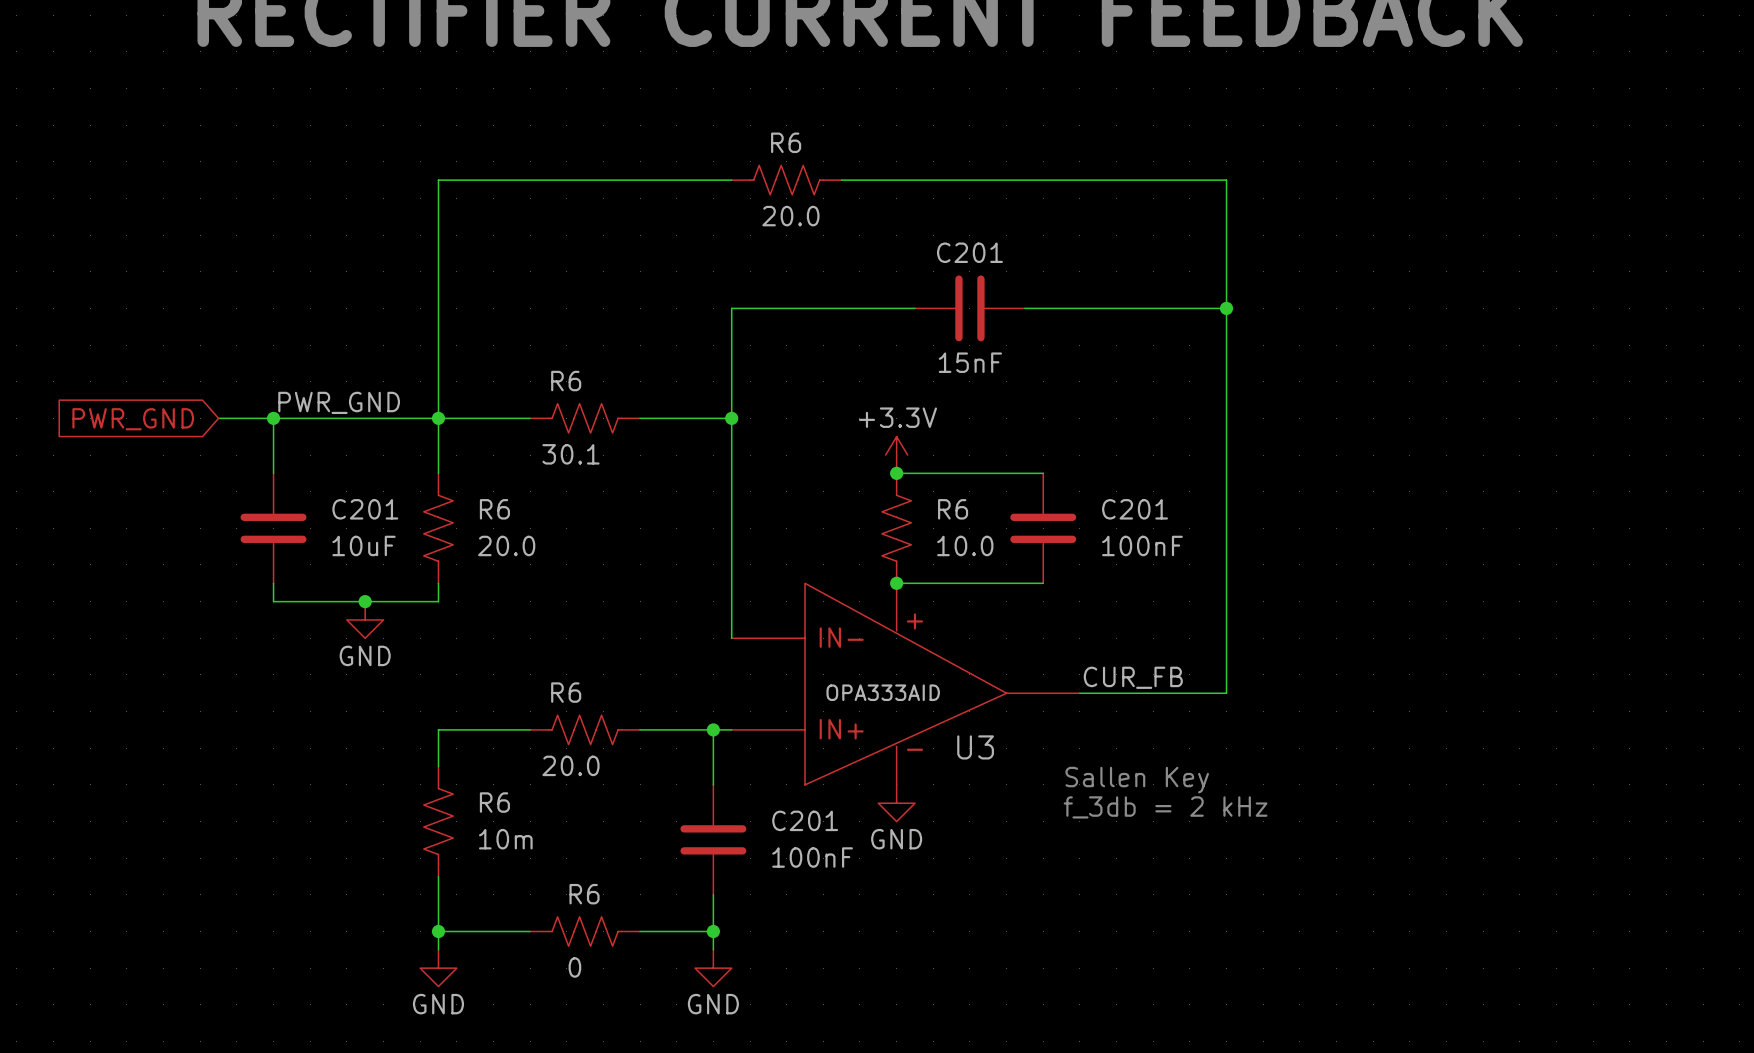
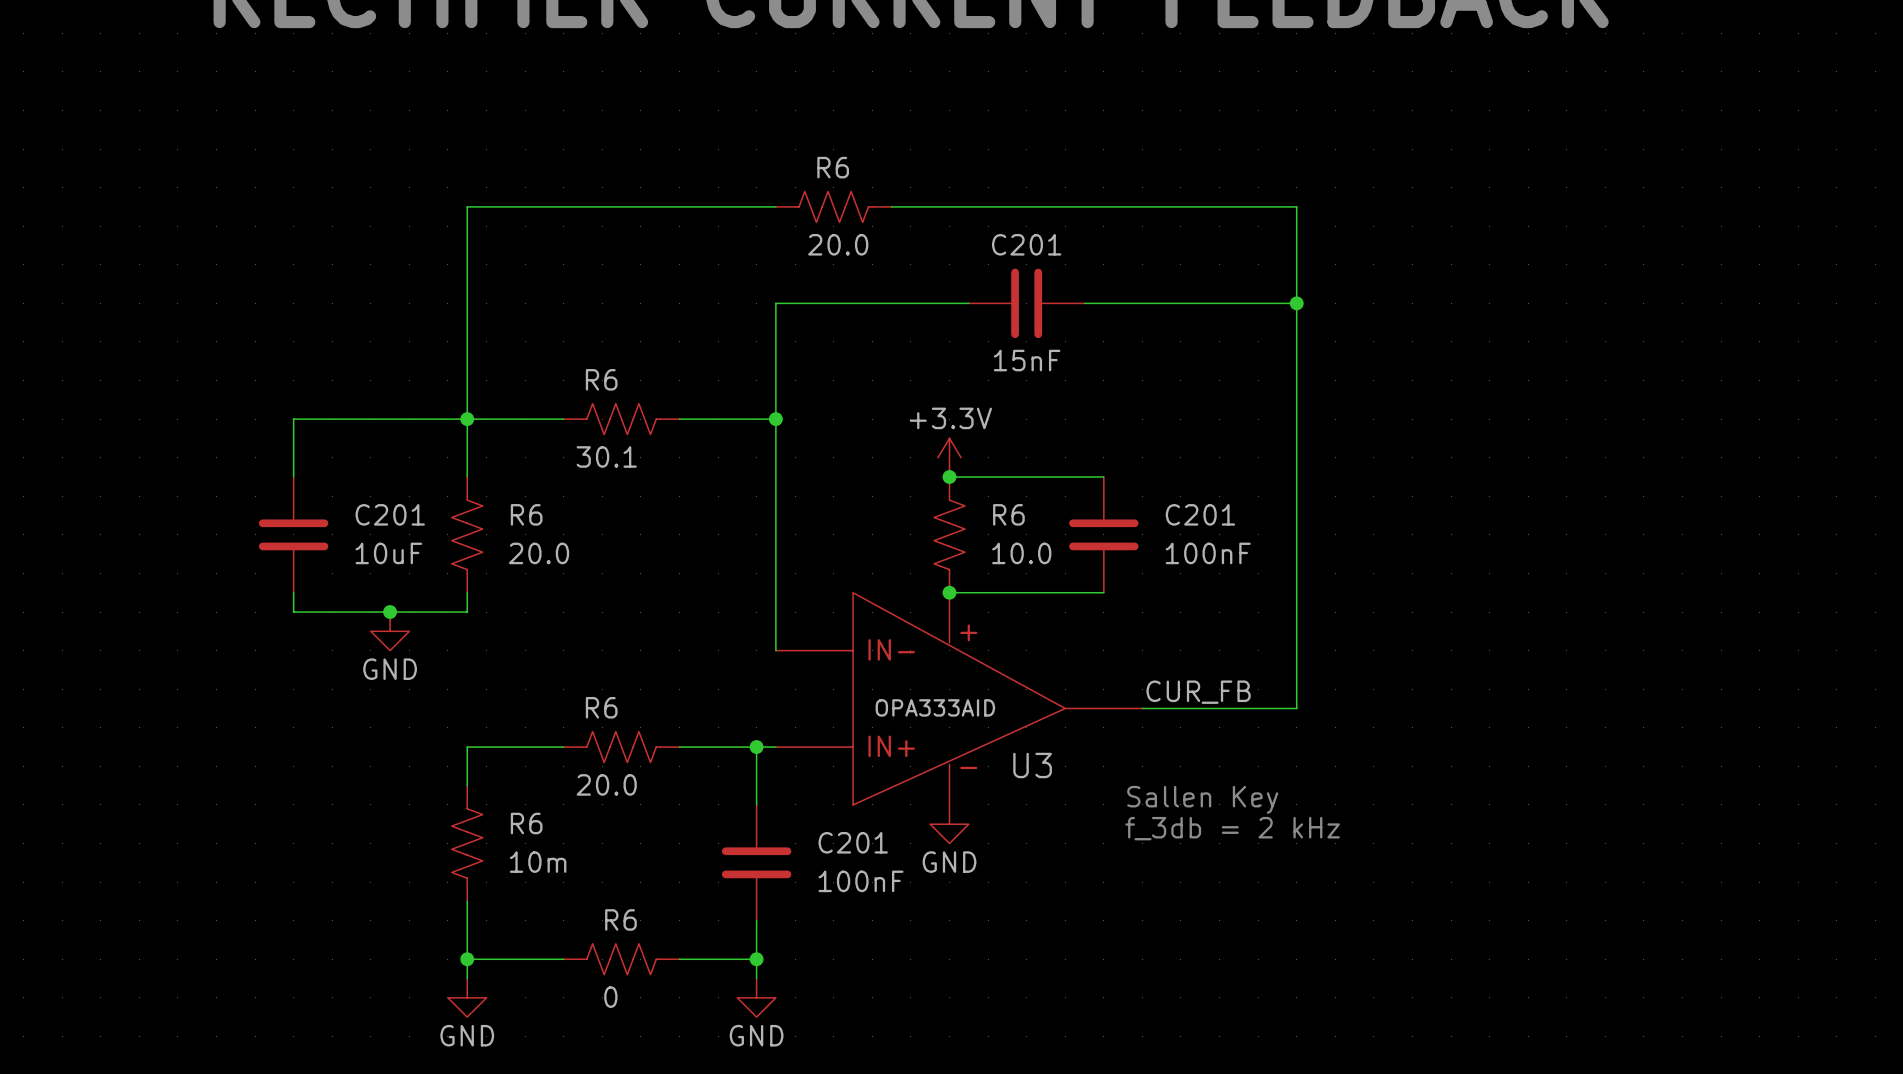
wire: (731, 180) (438, 180) (438, 216) -> (775, 206) (467, 206)
R6 position: (786, 180) -> (833, 206)
wire: (841, 180) (1226, 180) (1226, 216) -> (891, 206) (1296, 206)
label: PWR_GND (339, 402) -> none
wire: (218, 418) (273, 418) -> none
junction: (273, 418) -> none
global label: PWR_GND (133, 419) -> none

